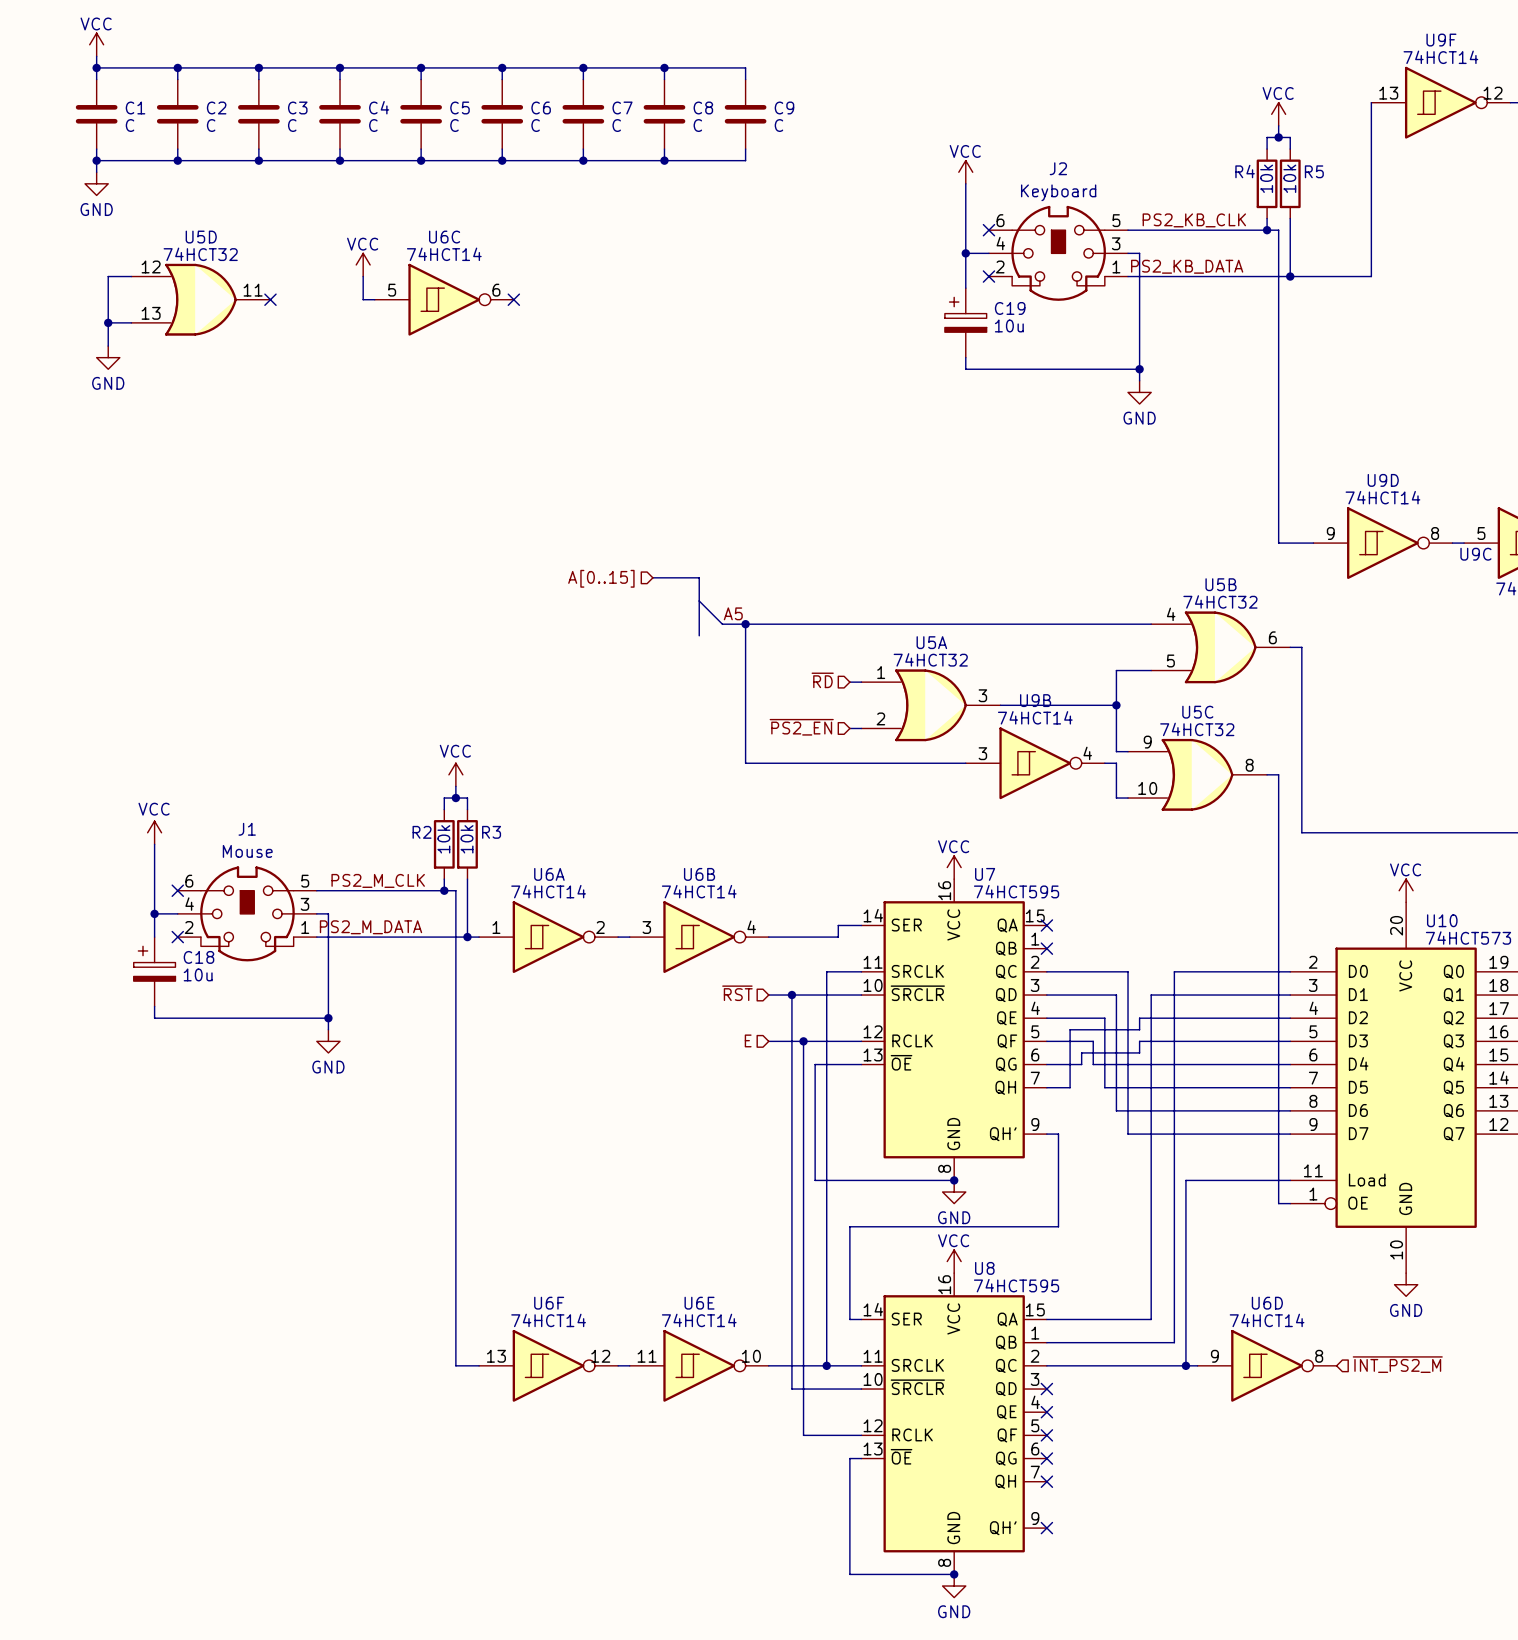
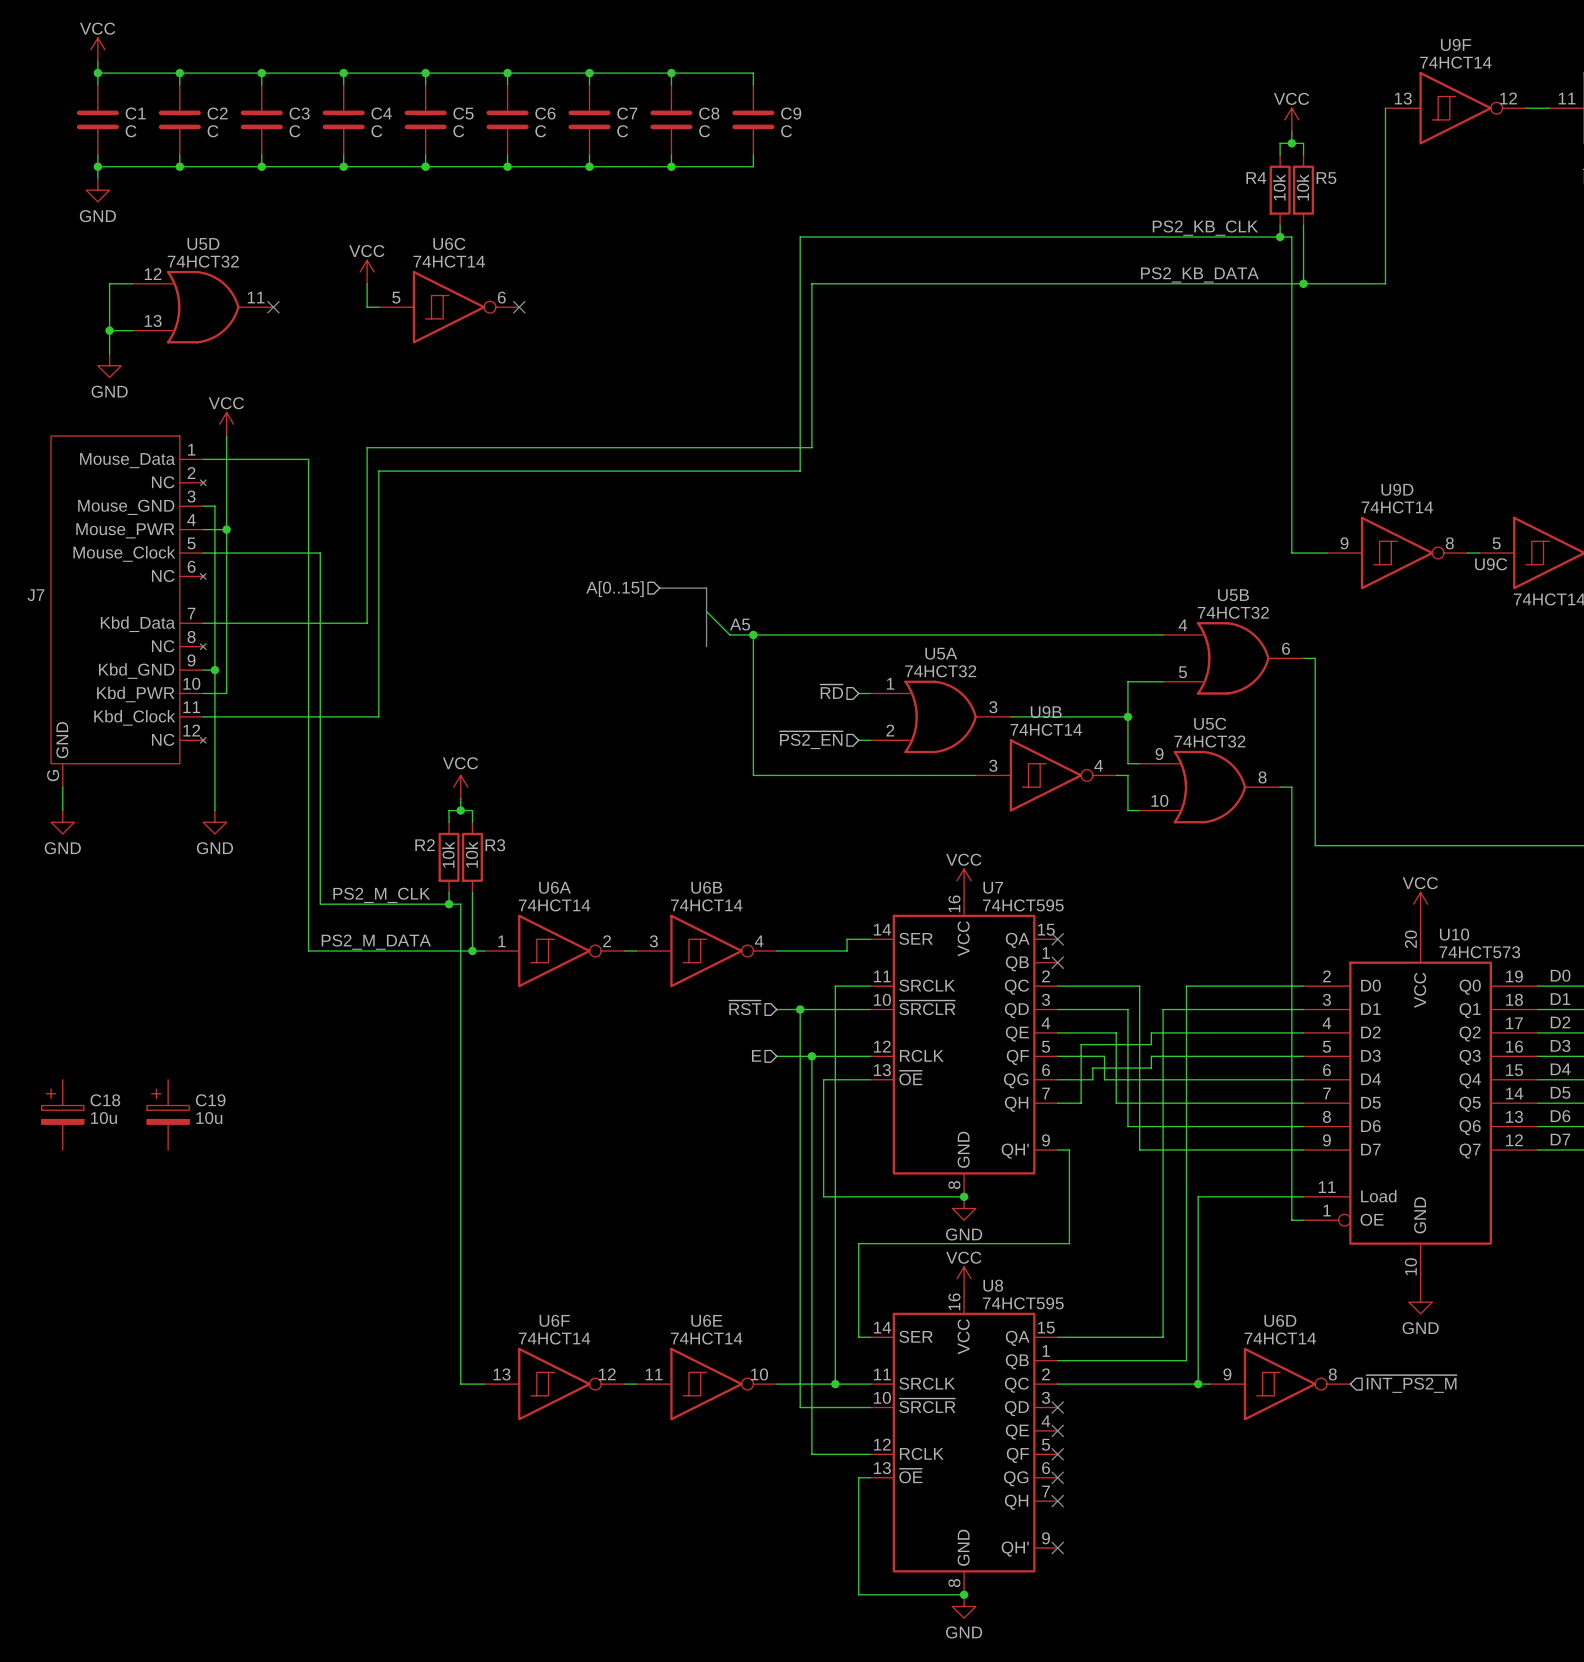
power symbol: VCC (965, 172) -> none
wire: (965, 183) (965, 288) -> none
no-connect mark: (988, 230) -> none
wire: none -> (1139, 236) (800, 236) (800, 471) (378, 471) (378, 716) (203, 716)
wire: (965, 253) (988, 253) -> none
junction: (965, 253) -> none
J2: Keyboard (1058, 253) -> none
wire: (1128, 253) (1139, 253) (1139, 380) -> none
no-connect mark: (988, 276) -> none
wire: none -> (1139, 283) (811, 283) (811, 447) (367, 447) (367, 623) (203, 623)
C19 position: (965, 322) -> (168, 1114)
wire: (965, 357) (965, 369) (1139, 369) -> none
junction: (1139, 369) -> none
power symbol: GND (1139, 392) -> none
power symbol: none -> VCC (226, 424)
wire: none -> (226, 435) (226, 693) (203, 693)
wire: none -> (203, 459) (308, 459) (308, 951) (320, 951)
wire: none -> (203, 506) (214, 506) (214, 810)
wire: none -> (203, 529) (226, 529)
junction: none -> (226, 529)
wire: none -> (203, 553) (320, 553) (320, 904)
J7: none -> (128, 611)
wire: none -> (203, 670) (214, 670)
junction: none -> (214, 670)
wire: none -> (62, 787) (62, 810)
power symbol: none -> GND (62, 822)
power symbol: none -> GND (214, 822)
power symbol: VCC (154, 832) -> none
wire: (154, 844) (154, 937) -> none
no-connect mark: (177, 890) -> none
wire: (154, 913) (177, 913) -> none
junction: (154, 913) -> none
J1: Mouse (247, 913) -> none
wire: (316, 913) (328, 913) (328, 1029) -> none
no-connect mark: (177, 937) -> none
C18 position: (154, 971) -> (62, 1114)
wire: (154, 1006) (154, 1018) (328, 1018) -> none
junction: (328, 1018) -> none
power symbol: GND (328, 1041) -> none

